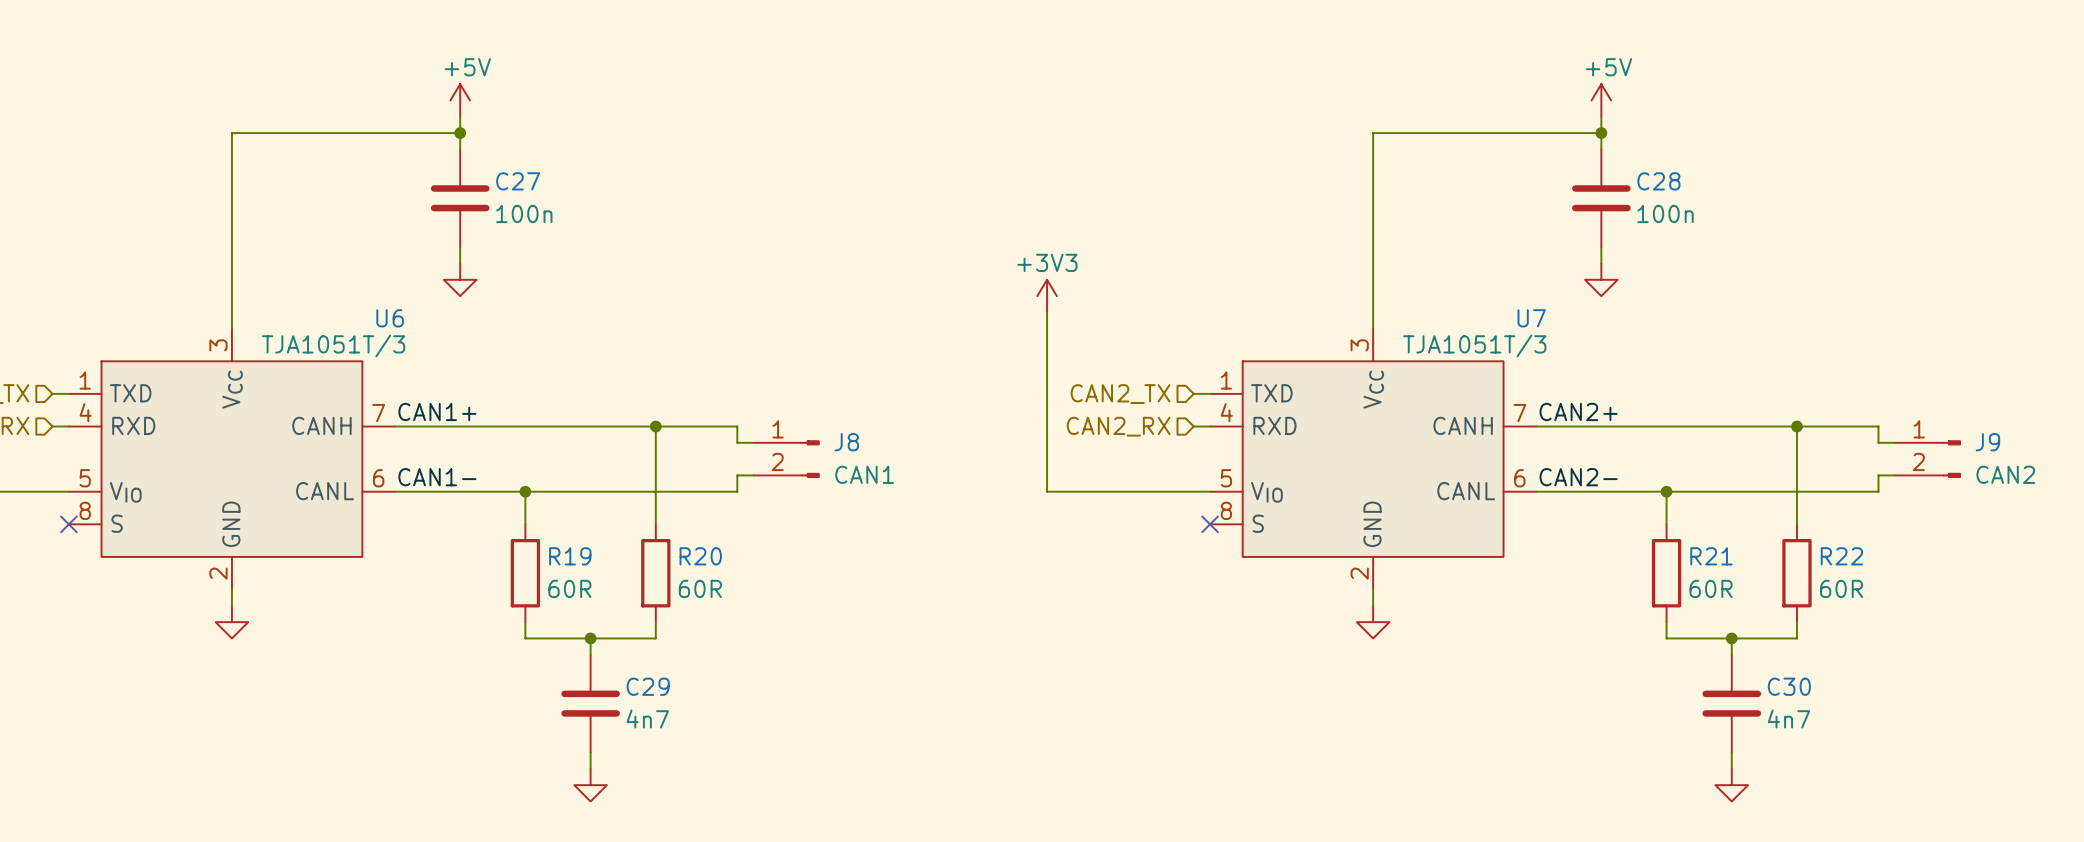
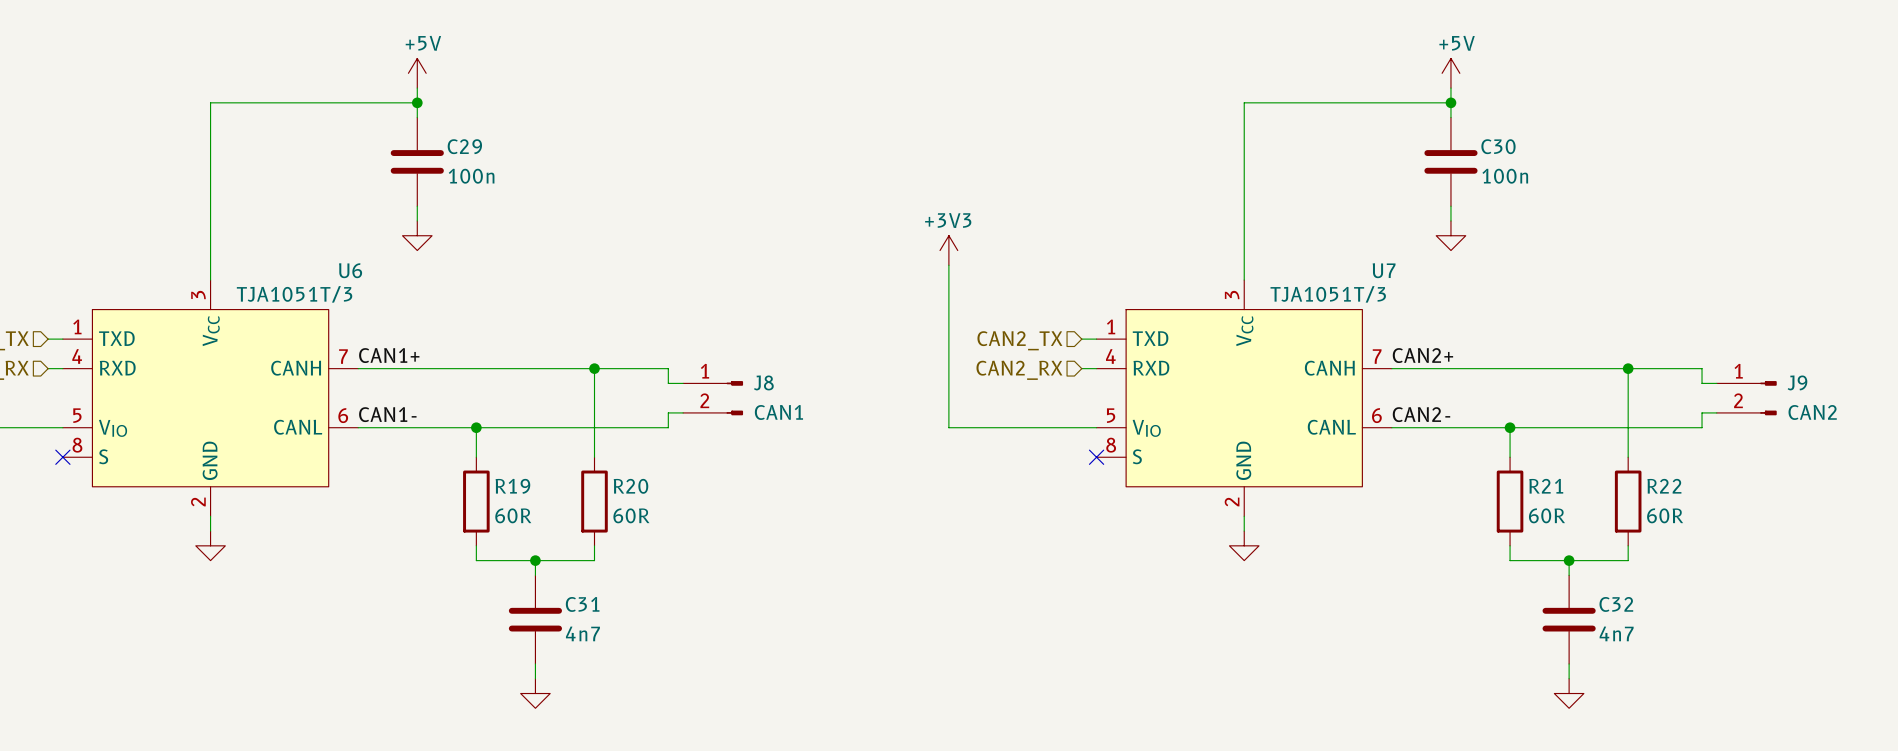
C27 name: C27 (518, 181) -> C29 (464, 146)
C28 name: C28 (1658, 181) -> C30 (1498, 146)
C29 name: C29 (648, 686) -> C31 (582, 604)
C30 name: C30 (1789, 686) -> C32 (1616, 604)

